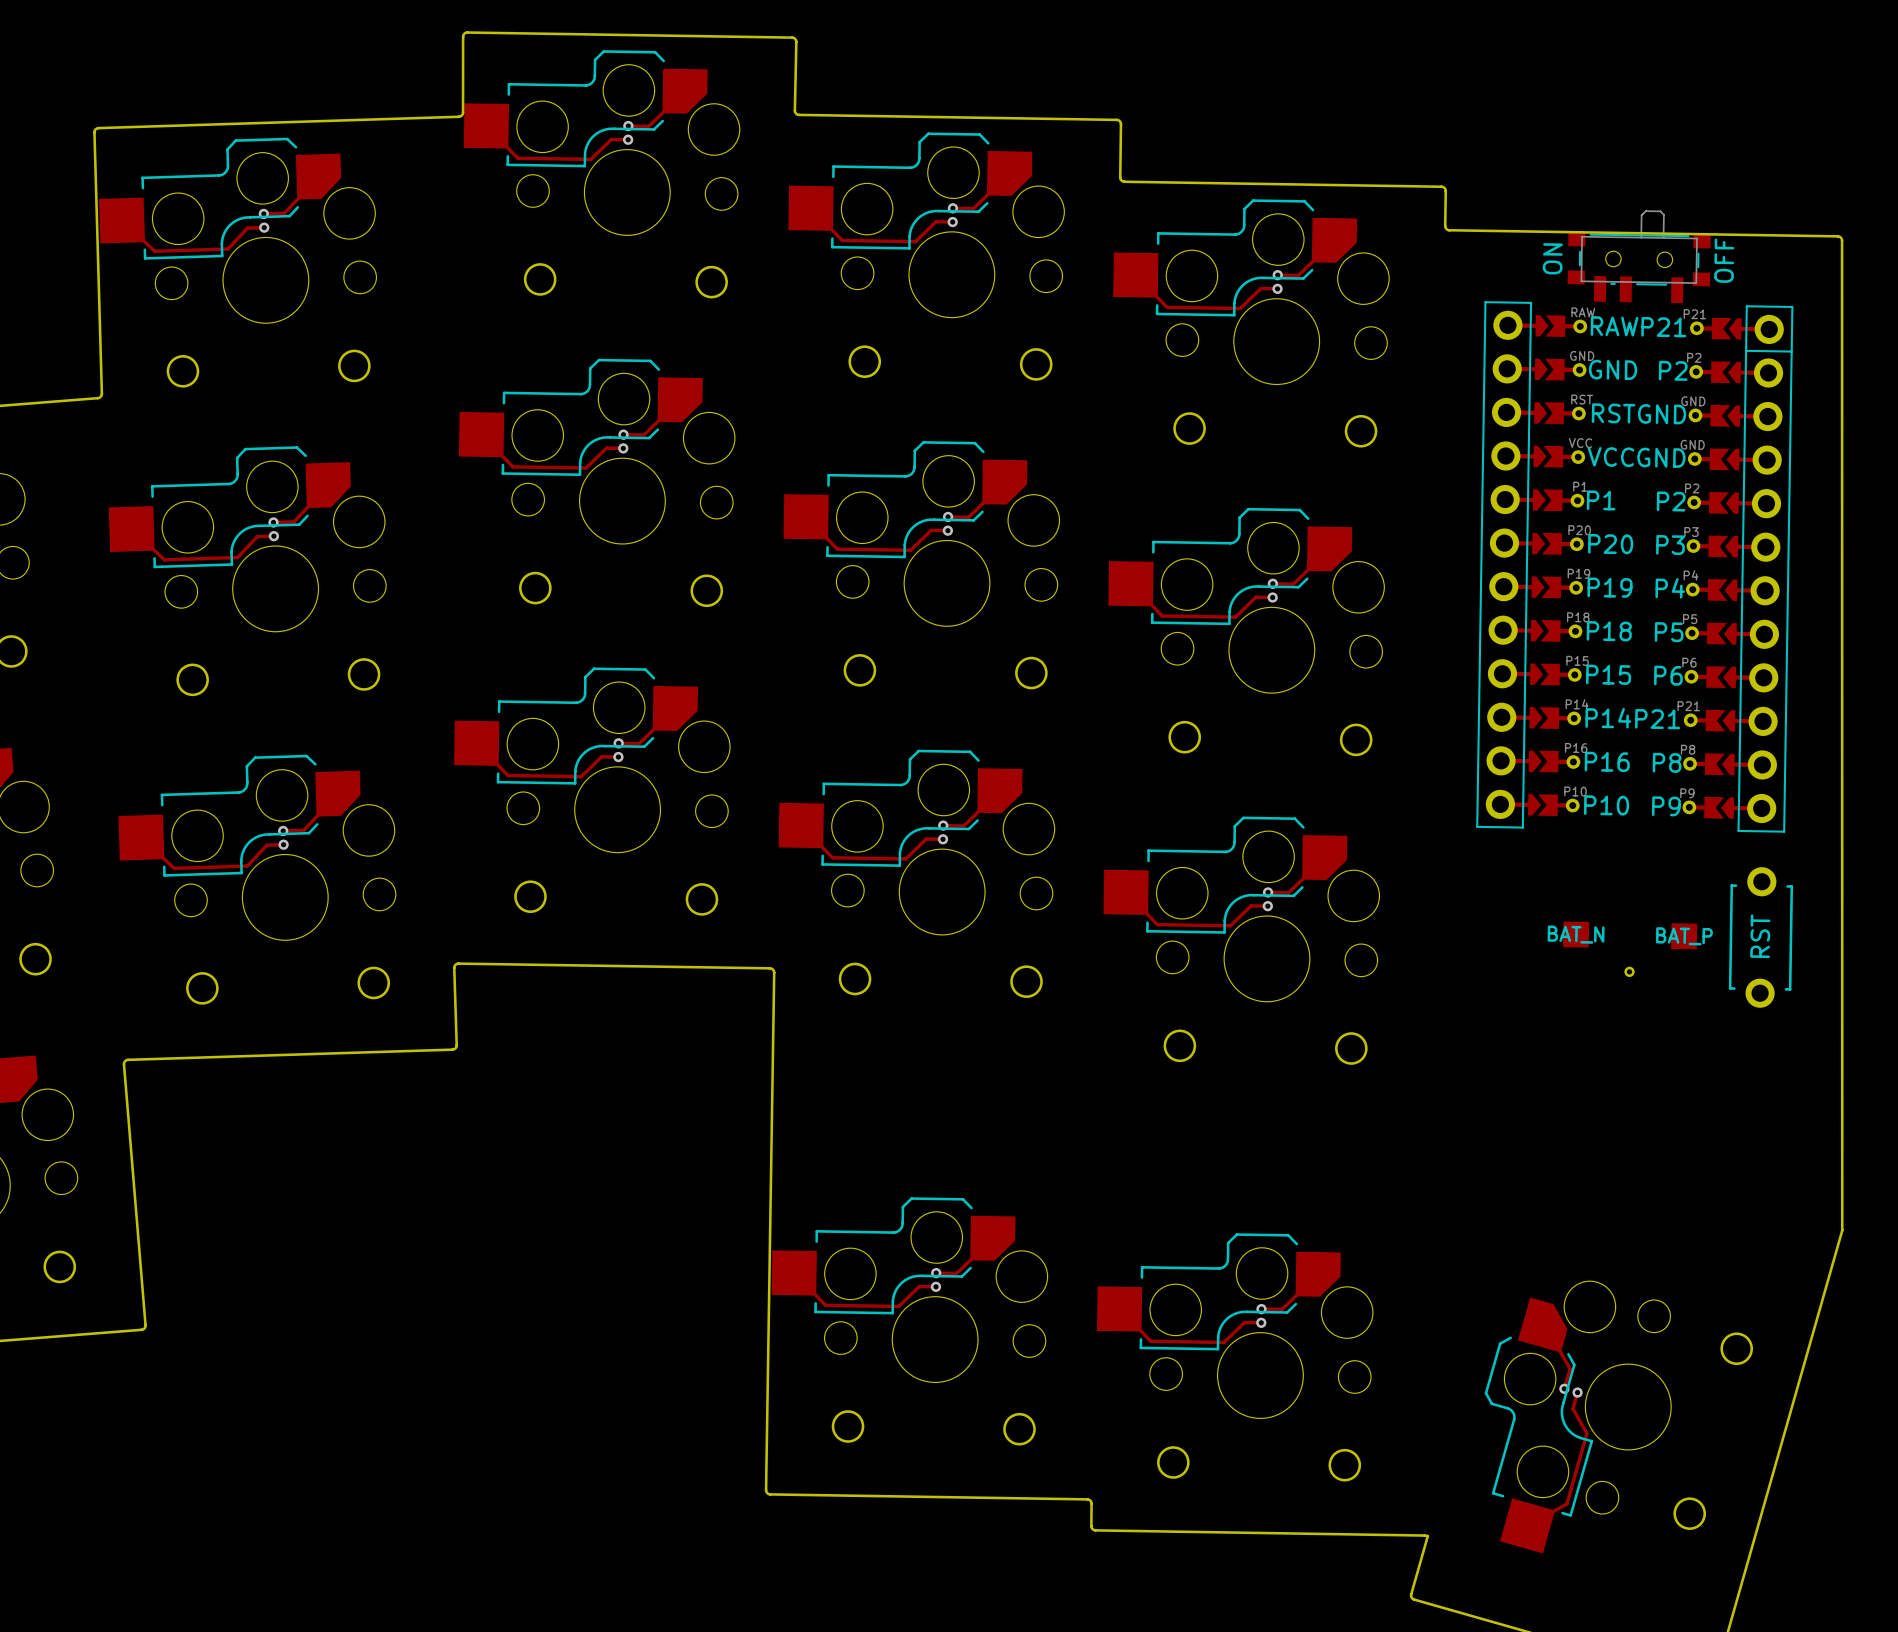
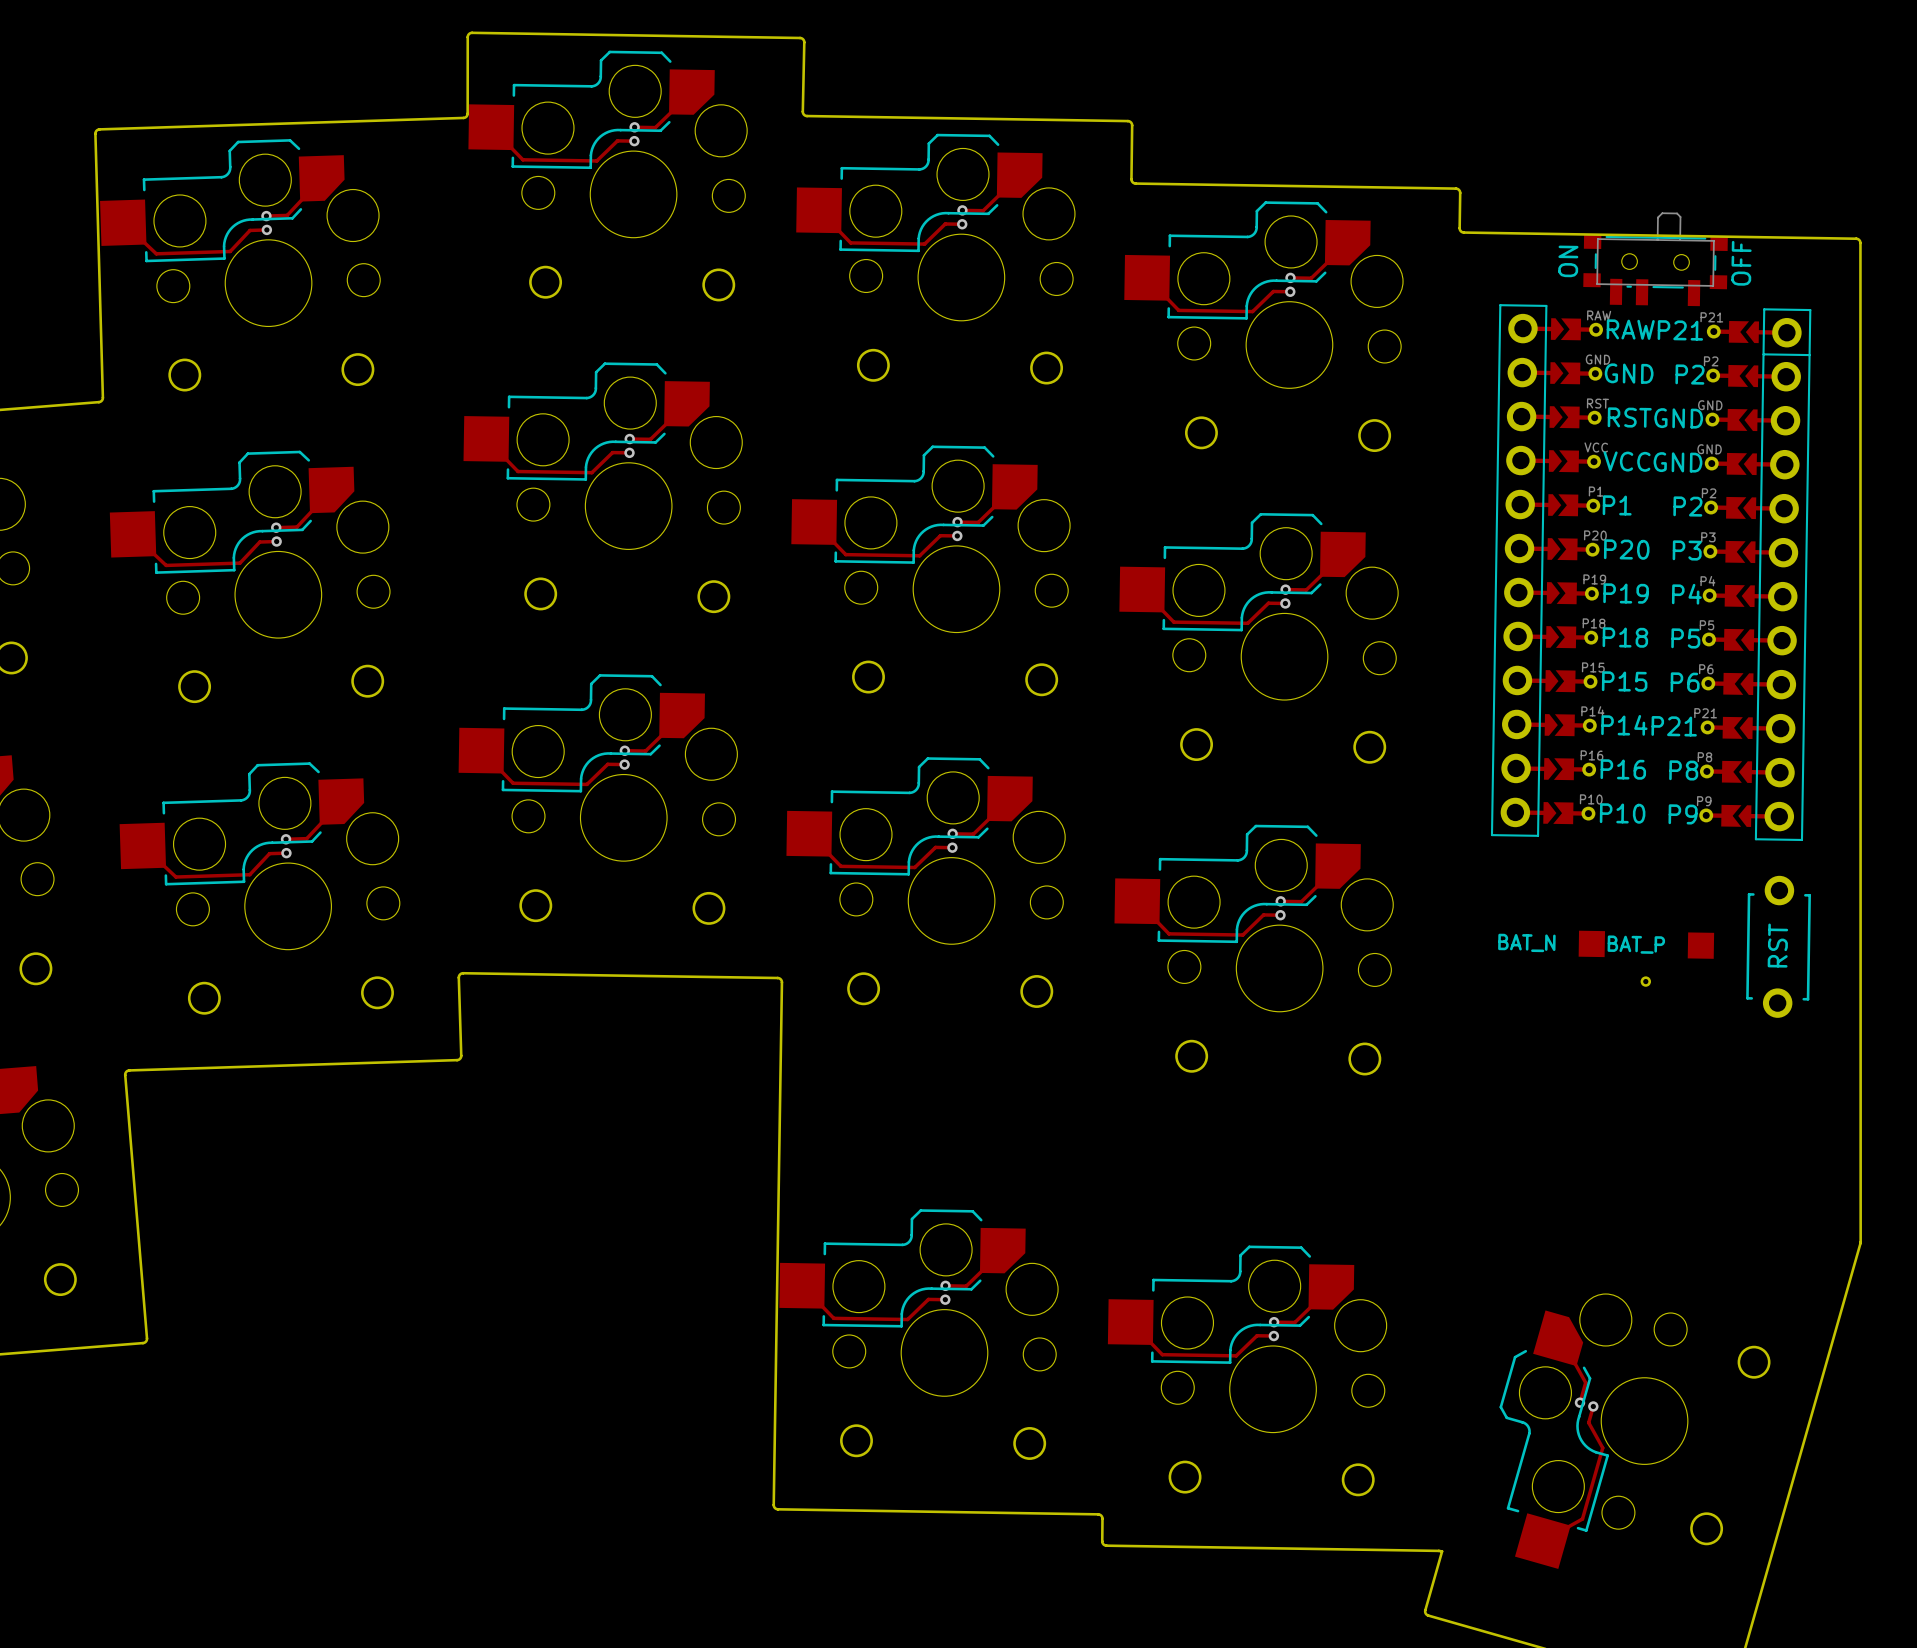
part text position: BAT_N (1576, 934) -> BAT_N (1526, 942)
part text position: BAT_P (1684, 936) -> BAT_P (1636, 944)

